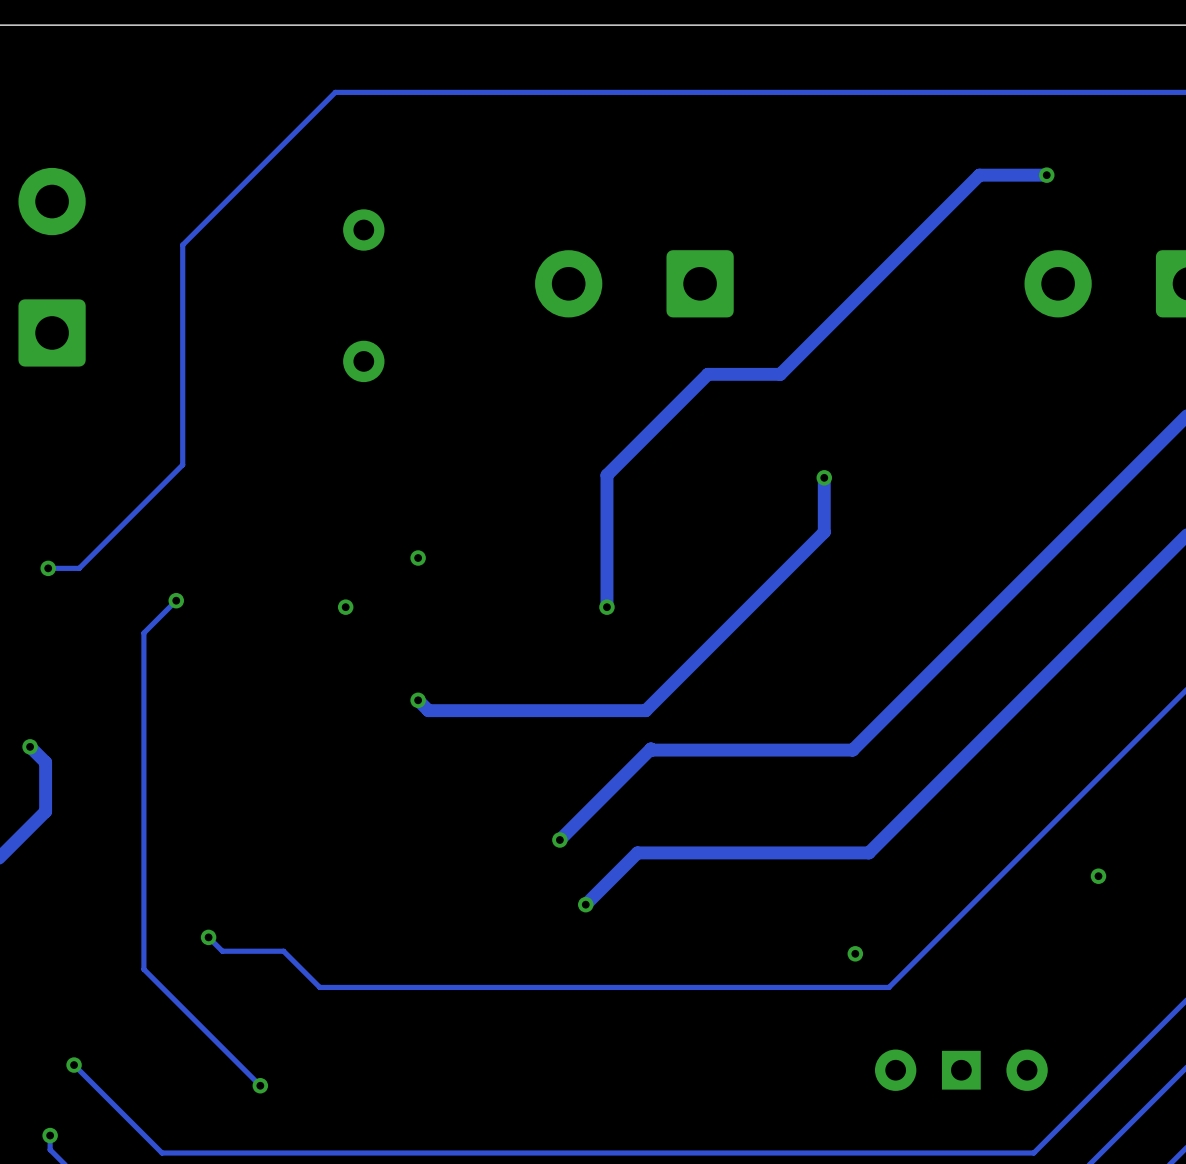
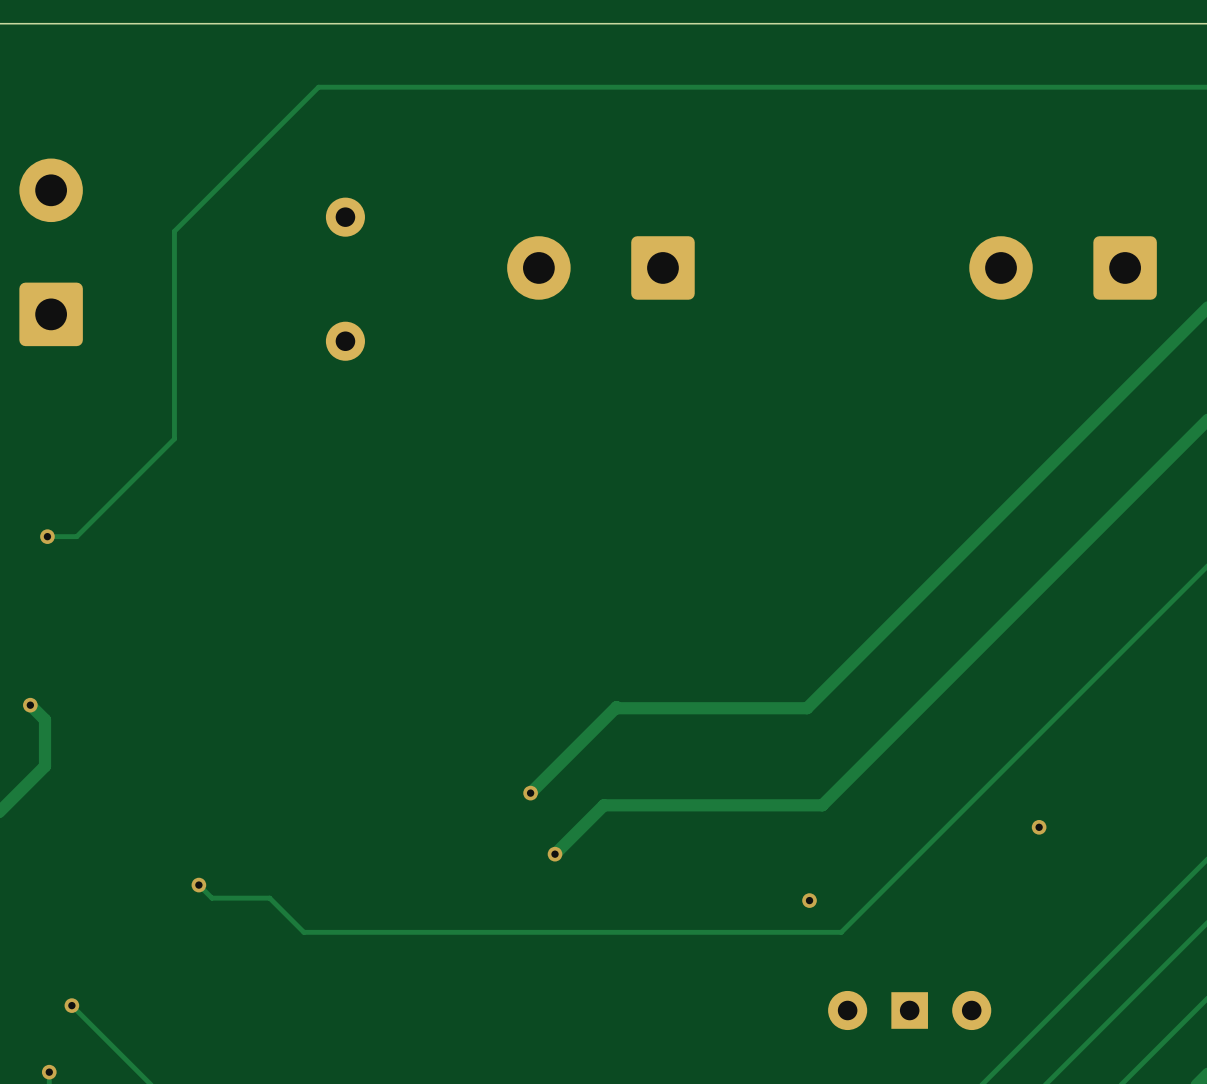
track: (1046, 175) (979, 175) (780, 374) (707, 374) (606, 475) (606, 607) -> none
via: (1046, 175) -> none
track: (824, 477) (824, 532) (645, 710) (428, 710) (418, 700) -> none
via: (824, 477) -> none
via: (418, 558) -> none
track: (176, 600) (143, 633) (143, 969) (260, 1085) -> none
via: (176, 600) -> none
via: (345, 607) -> none
via: (606, 607) -> none
via: (418, 700) -> none
via: (260, 1085) -> none

